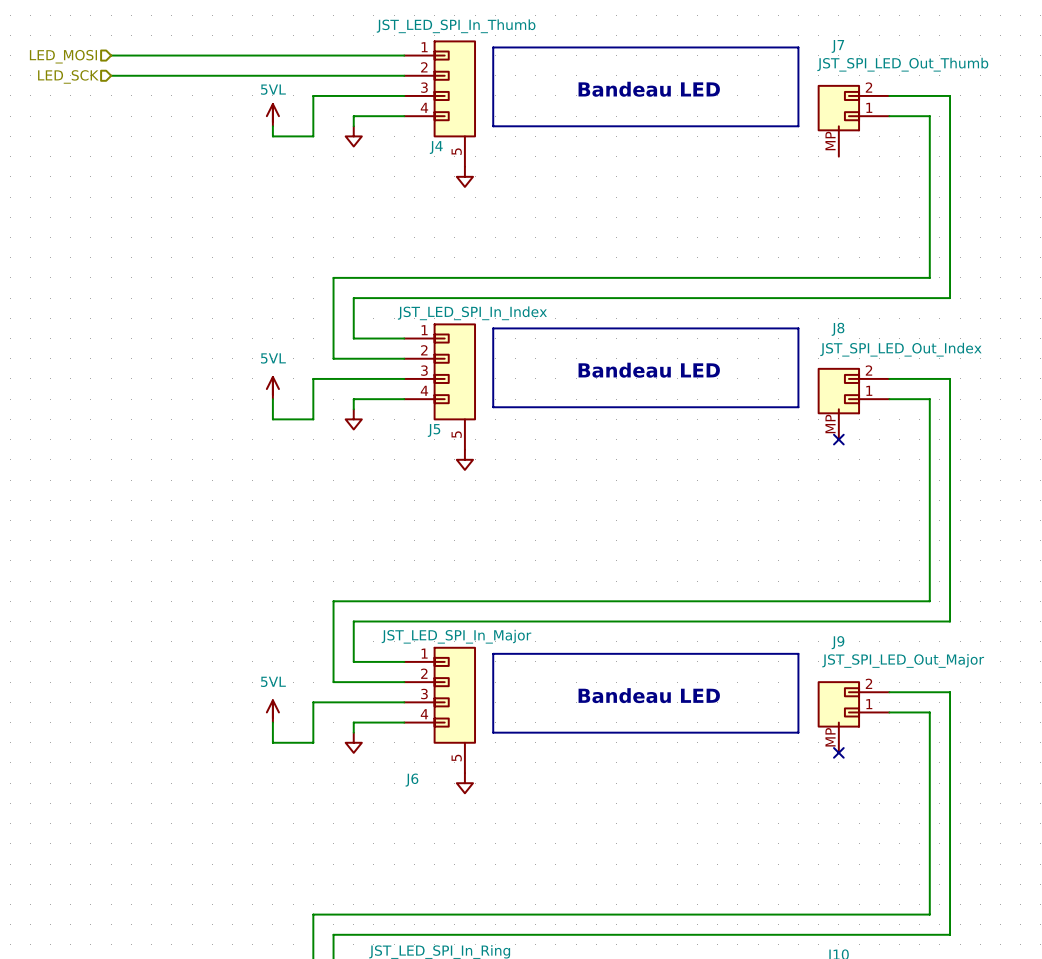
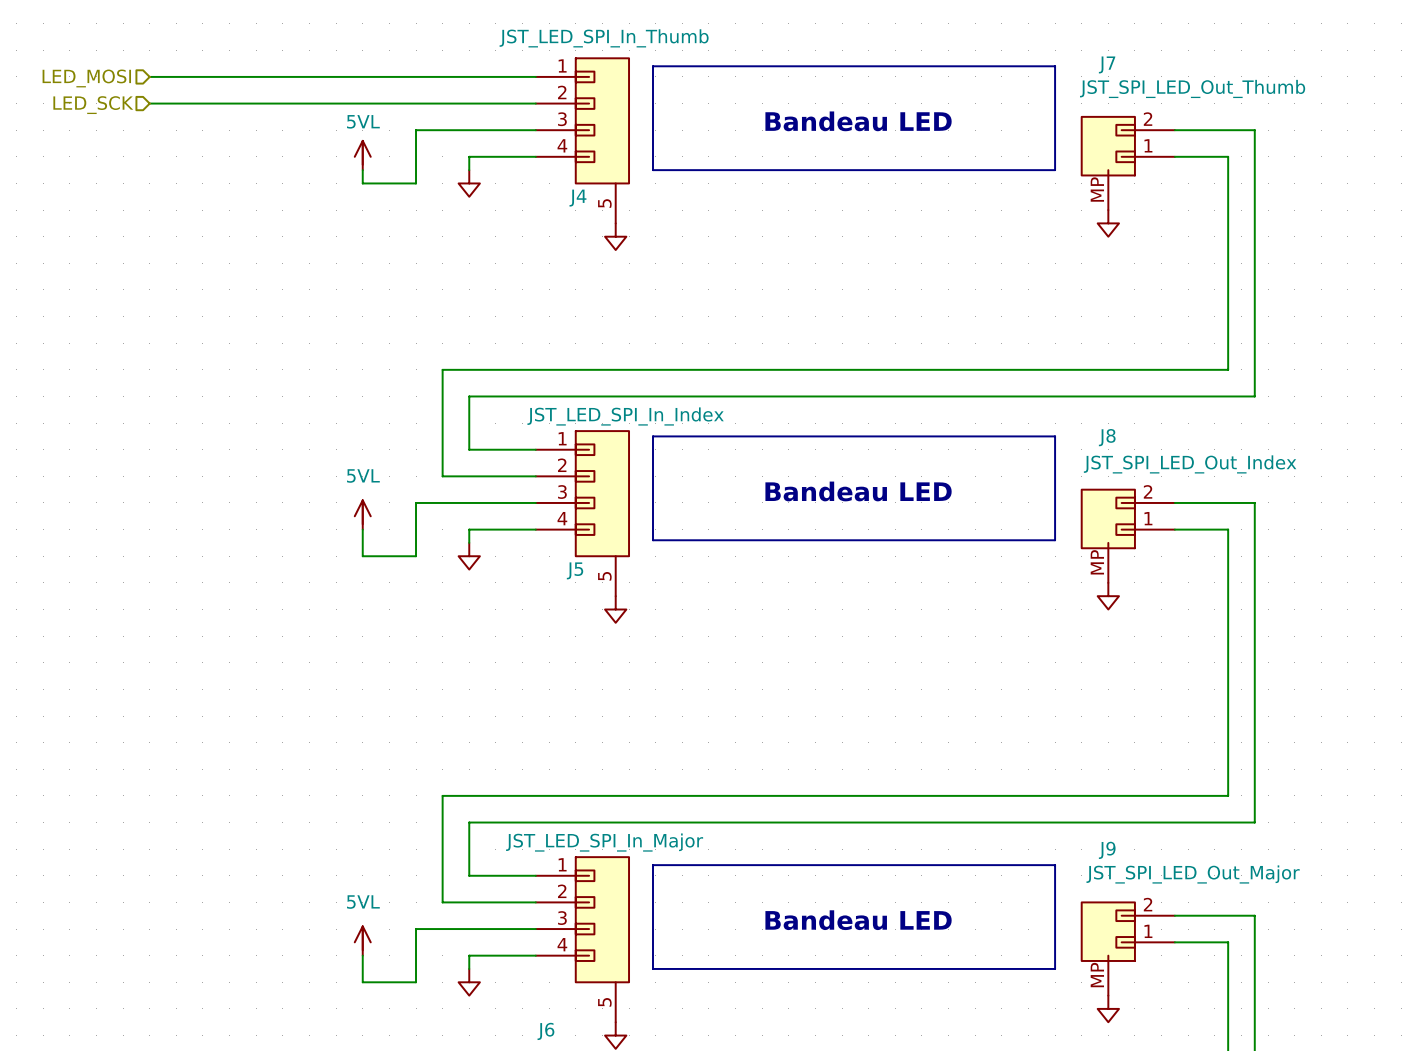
power symbol: none -> (1108, 223)
no-connect mark: (838, 439) -> none
power symbol: none -> (1108, 596)
no-connect mark: (838, 752) -> none
power symbol: none -> (1108, 1008)

